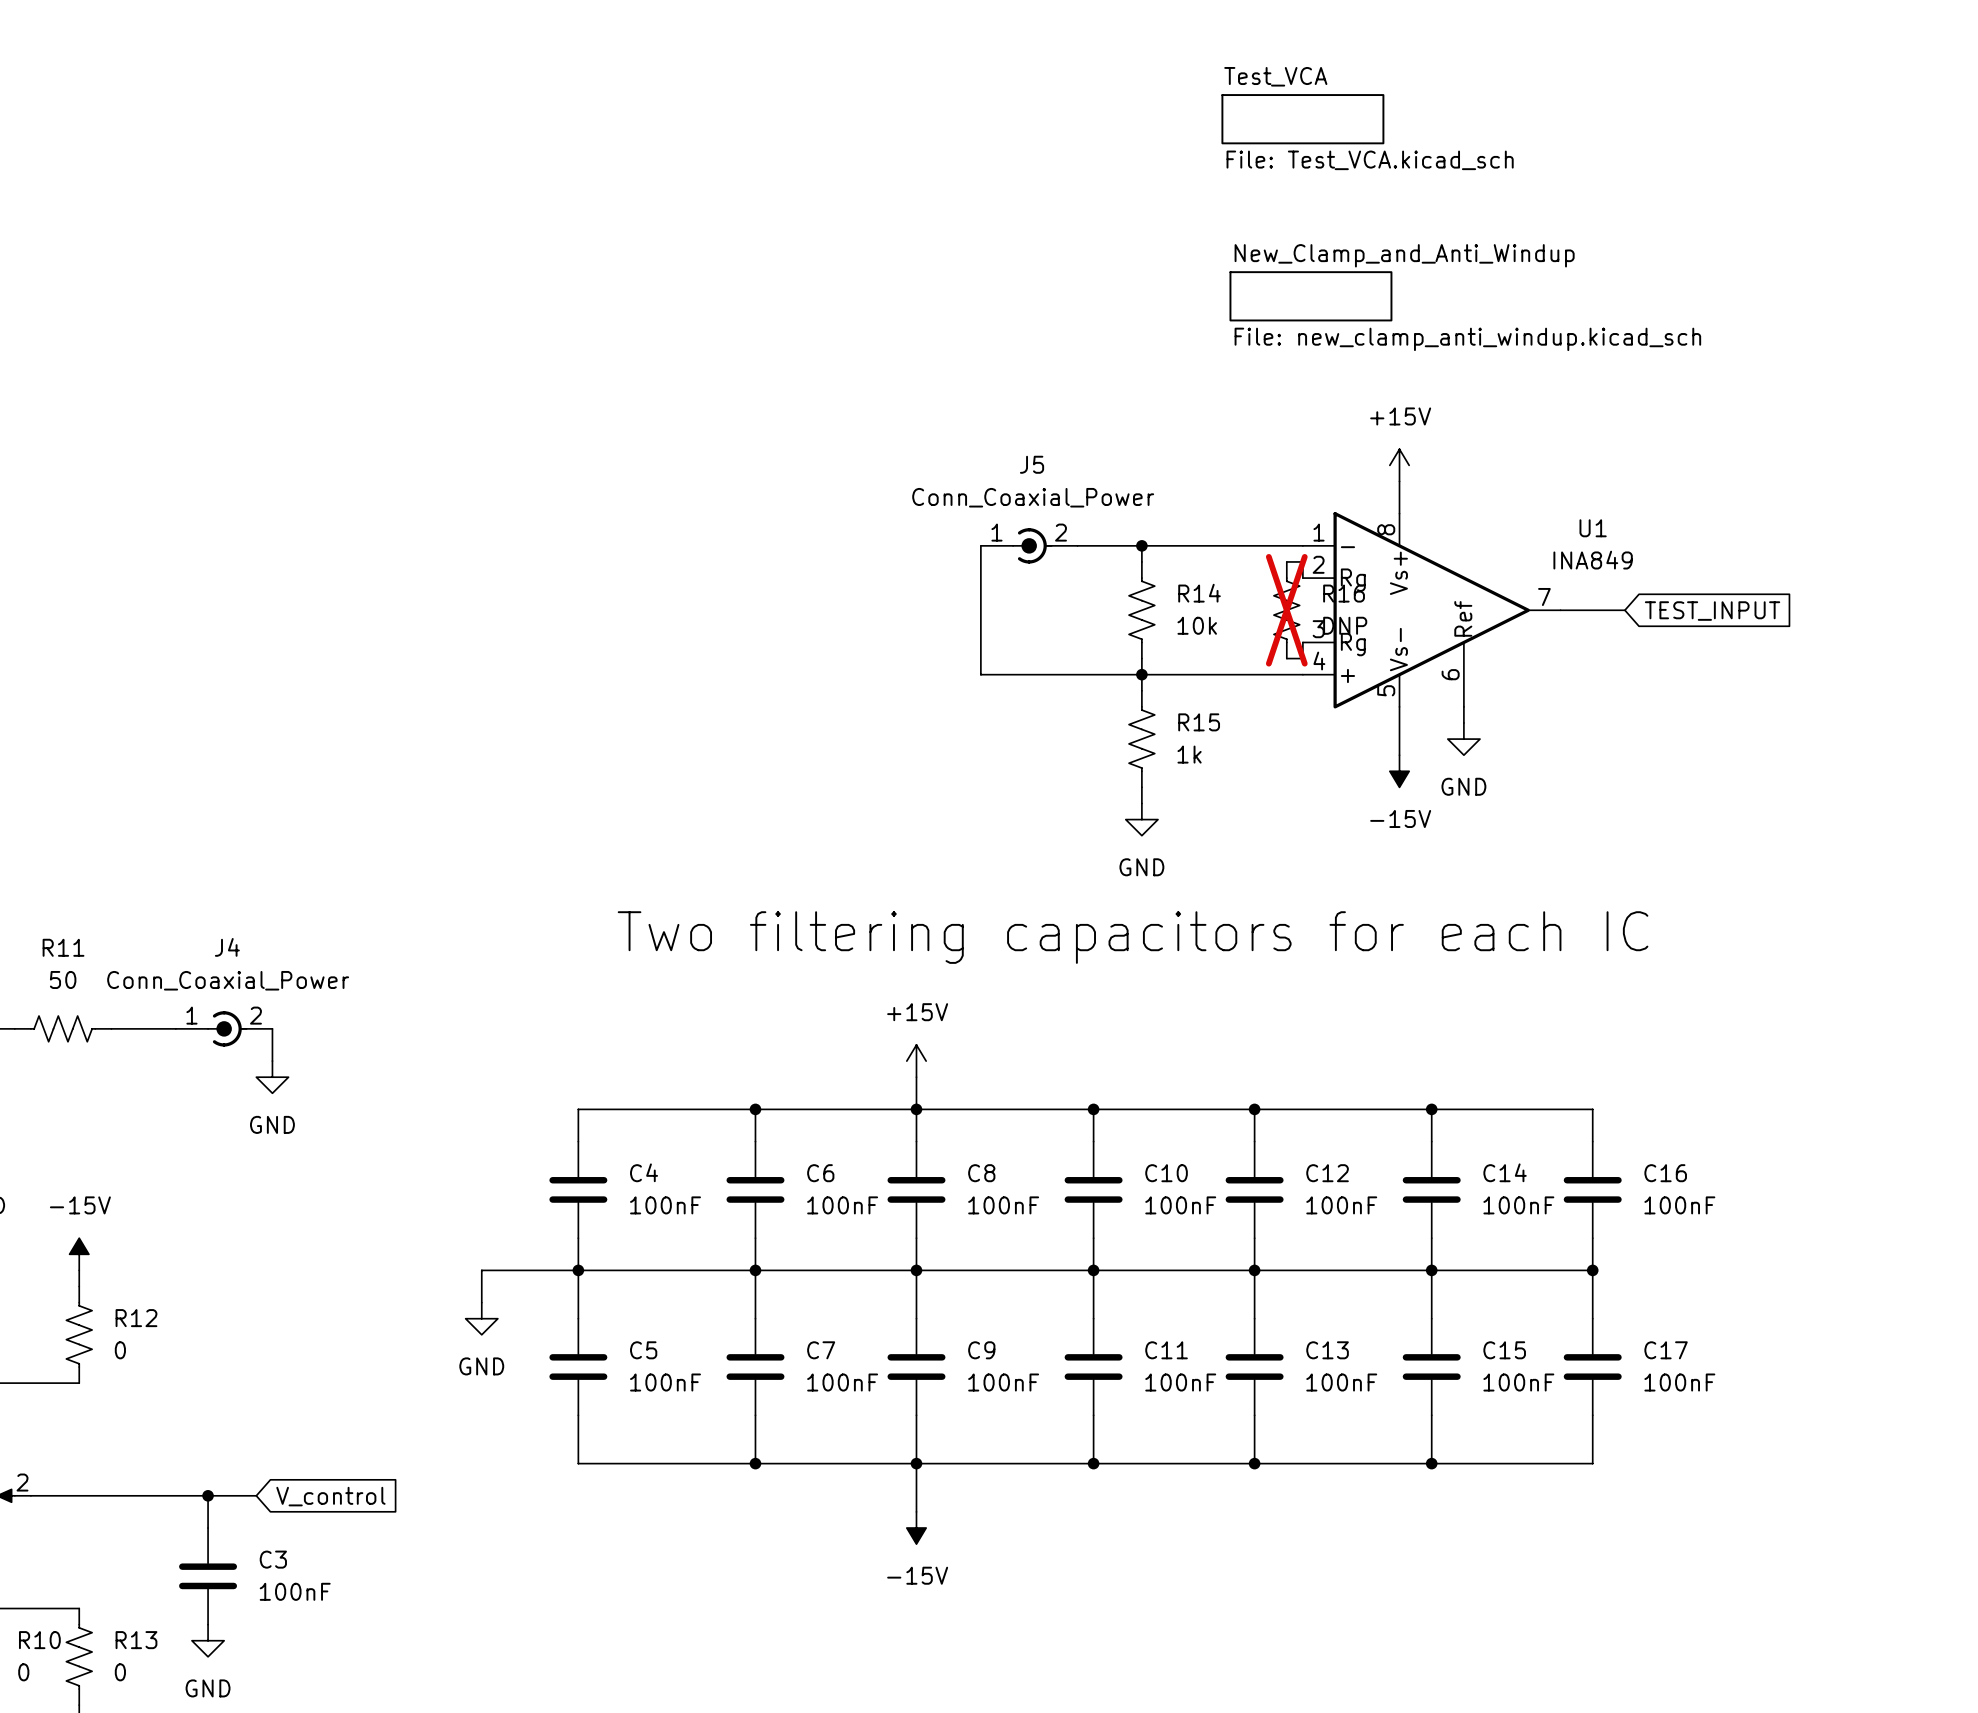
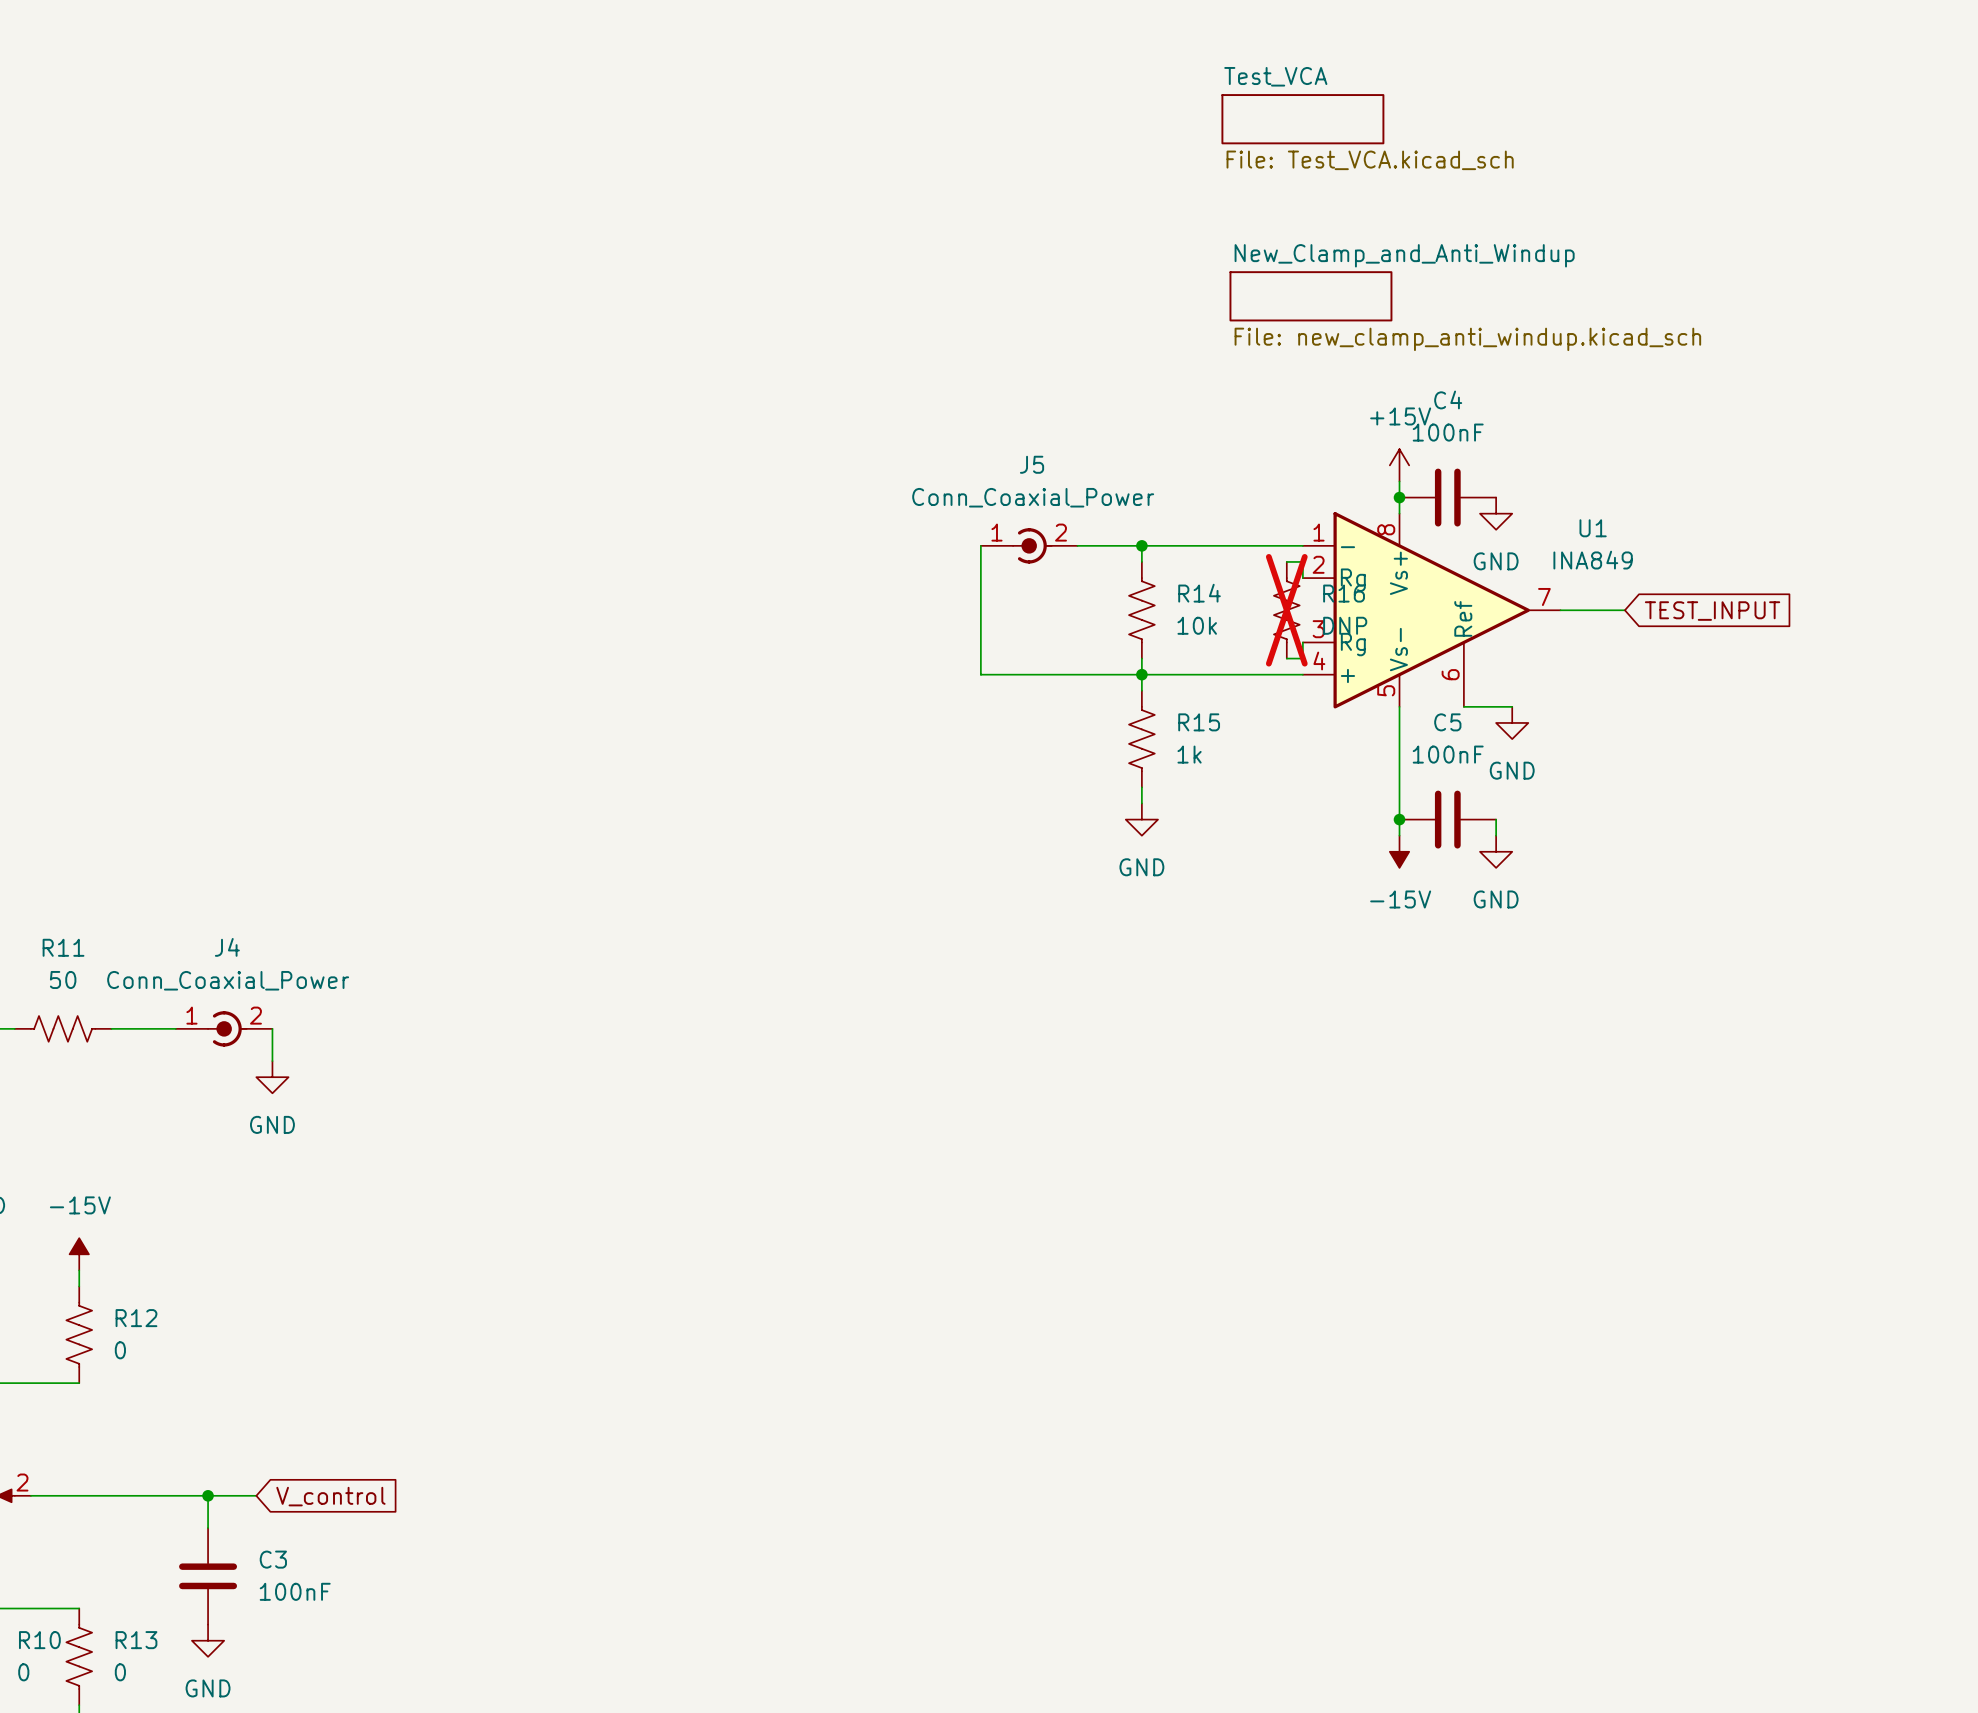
junction: none -> (1399, 497)
power symbol: none -> GND (1496, 513)
wire: (1463, 706) (1463, 722) -> (1463, 706) (1512, 706)
power symbol position: GND (1463, 739) -> GND (1512, 722)
wire: none -> (1399, 755) (1399, 835)
power symbol position: -15V (1399, 771) -> -15V (1399, 851)
junction: none -> (1399, 819)
wire: none -> (1496, 819) (1496, 835)
power symbol: none -> GND (1496, 851)
text: Two filtering capacitors for each IC (1133, 937) -> none
power symbol: +15V (916, 1061) -> none
wire: (916, 1077) (916, 1141) -> none
wire: (755, 1109) (755, 1141) -> none
junction: (755, 1109) -> none
junction: (916, 1109) -> none
wire: (1093, 1109) (1093, 1141) -> none
junction: (1093, 1109) -> none
wire: (1254, 1109) (1254, 1141) -> none
junction: (1254, 1109) -> none
wire: (1431, 1109) (1431, 1141) -> none
junction: (1431, 1109) -> none
wire: (578, 1141) (578, 1109) (1592, 1109) (1592, 1141) -> none
C4 name position: C4 (644, 1172) -> C4 (1448, 399)
C4 rotation: 0° (578, 1189) -> 90° clockwise (1447, 497)
C4 position: (578, 1189) -> (1447, 497)
C6: 100nF (755, 1189) -> none
C8: 100nF (916, 1189) -> none
C10: 100nF (1093, 1189) -> none
C12: 100nF (1254, 1189) -> none
C14: 100nF (1431, 1189) -> none
C16: 100nF (1592, 1189) -> none
C4 value position: 100nF (665, 1205) -> 100nF (1448, 432)
wire: (578, 1238) (578, 1318) -> none
wire: (755, 1238) (755, 1318) -> none
wire: (916, 1238) (916, 1318) -> none
wire: (1093, 1238) (1093, 1318) -> none
wire: (1254, 1238) (1254, 1318) -> none
wire: (1431, 1238) (1431, 1318) -> none
wire: (1592, 1238) (1592, 1318) -> none
junction: (578, 1270) -> none
junction: (755, 1270) -> none
junction: (916, 1270) -> none
junction: (1093, 1270) -> none
junction: (1254, 1270) -> none
junction: (1431, 1270) -> none
wire: (1592, 1270) (481, 1270) (481, 1302) -> none
junction: (1592, 1270) -> none
power symbol: GND (481, 1318) -> none
C5 name position: C5 (643, 1350) -> C5 (1447, 722)
C5 rotation: 0° (578, 1367) -> 90° clockwise (1447, 819)
C5 position: (578, 1367) -> (1447, 819)
C7: 100nF (755, 1367) -> none
C9: 100nF (916, 1367) -> none
C11: 100nF (1093, 1367) -> none
C13: 100nF (1254, 1367) -> none
C15: 100nF (1431, 1367) -> none
C17: 100nF (1592, 1367) -> none
C5 value position: 100nF (665, 1382) -> 100nF (1448, 754)
wire: (578, 1415) (578, 1463) (1592, 1463) (1592, 1415) -> none
wire: (755, 1415) (755, 1463) -> none
wire: (916, 1415) (916, 1511) -> none
wire: (1093, 1415) (1093, 1463) -> none
wire: (1254, 1415) (1254, 1463) -> none
wire: (1431, 1415) (1431, 1463) -> none
junction: (755, 1463) -> none
junction: (916, 1463) -> none
junction: (1093, 1463) -> none
junction: (1254, 1463) -> none
junction: (1431, 1463) -> none
power symbol: -15V (916, 1528) -> none

